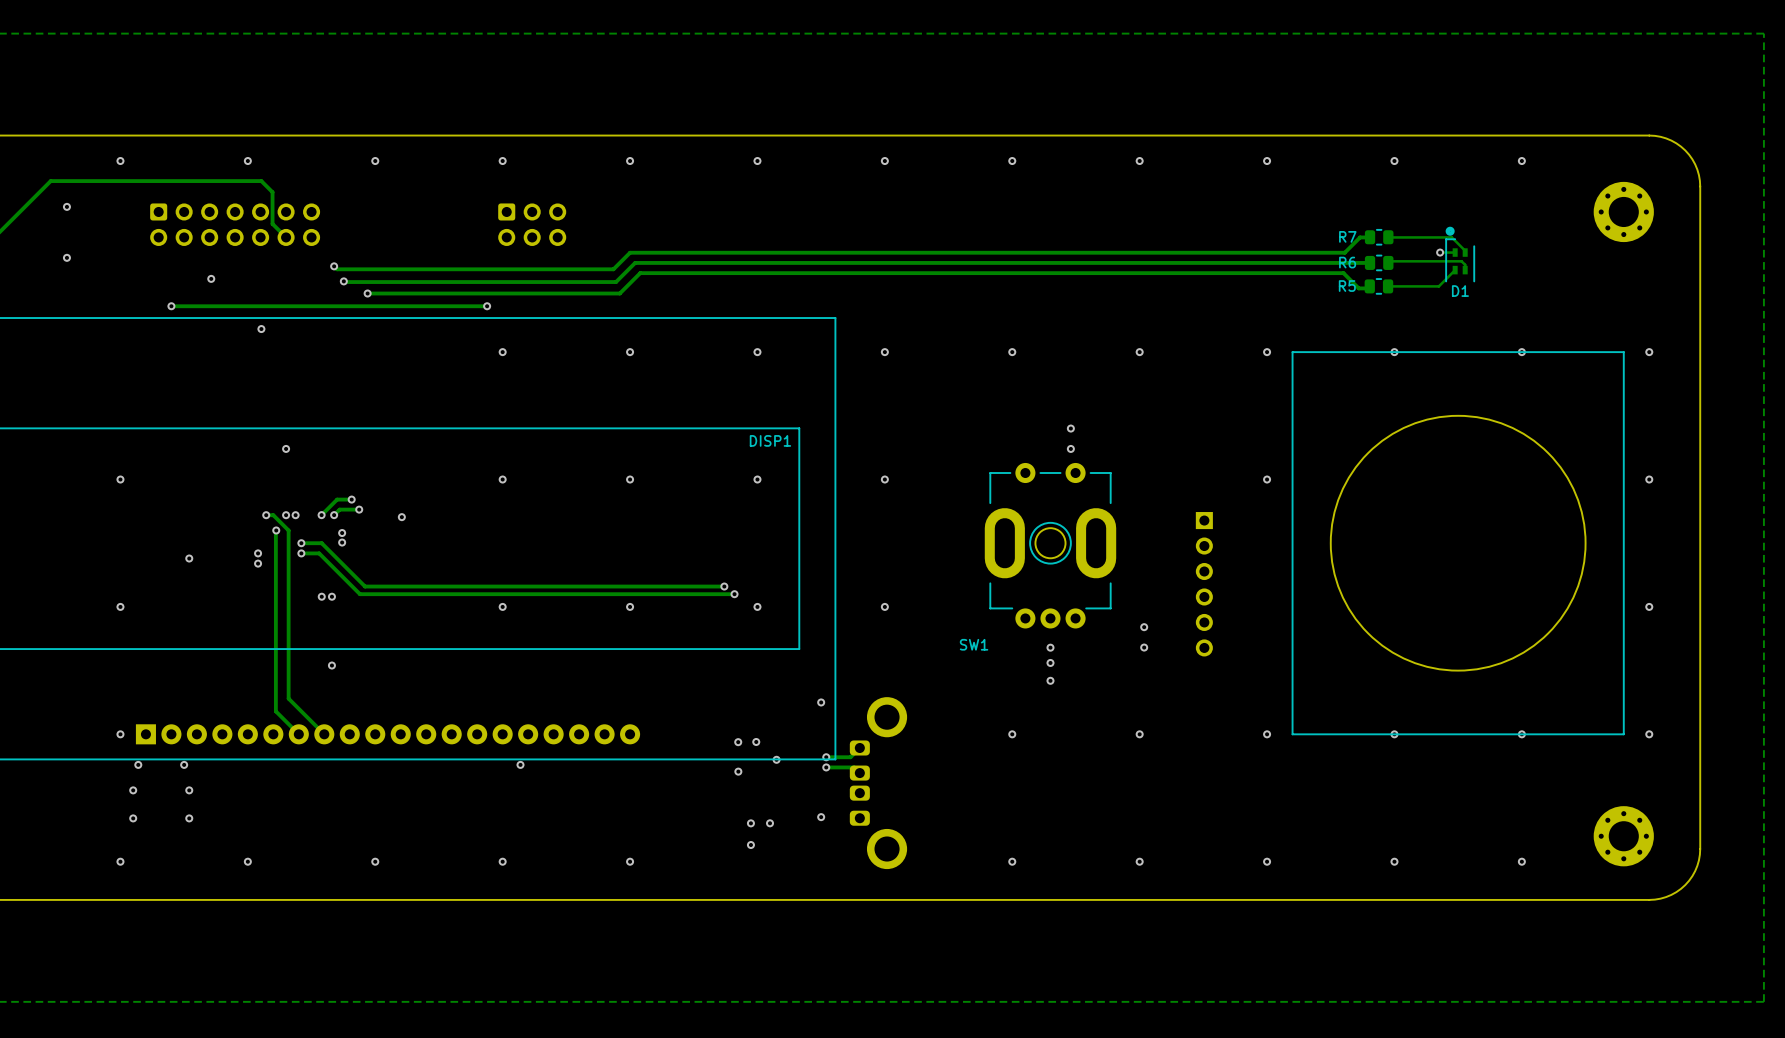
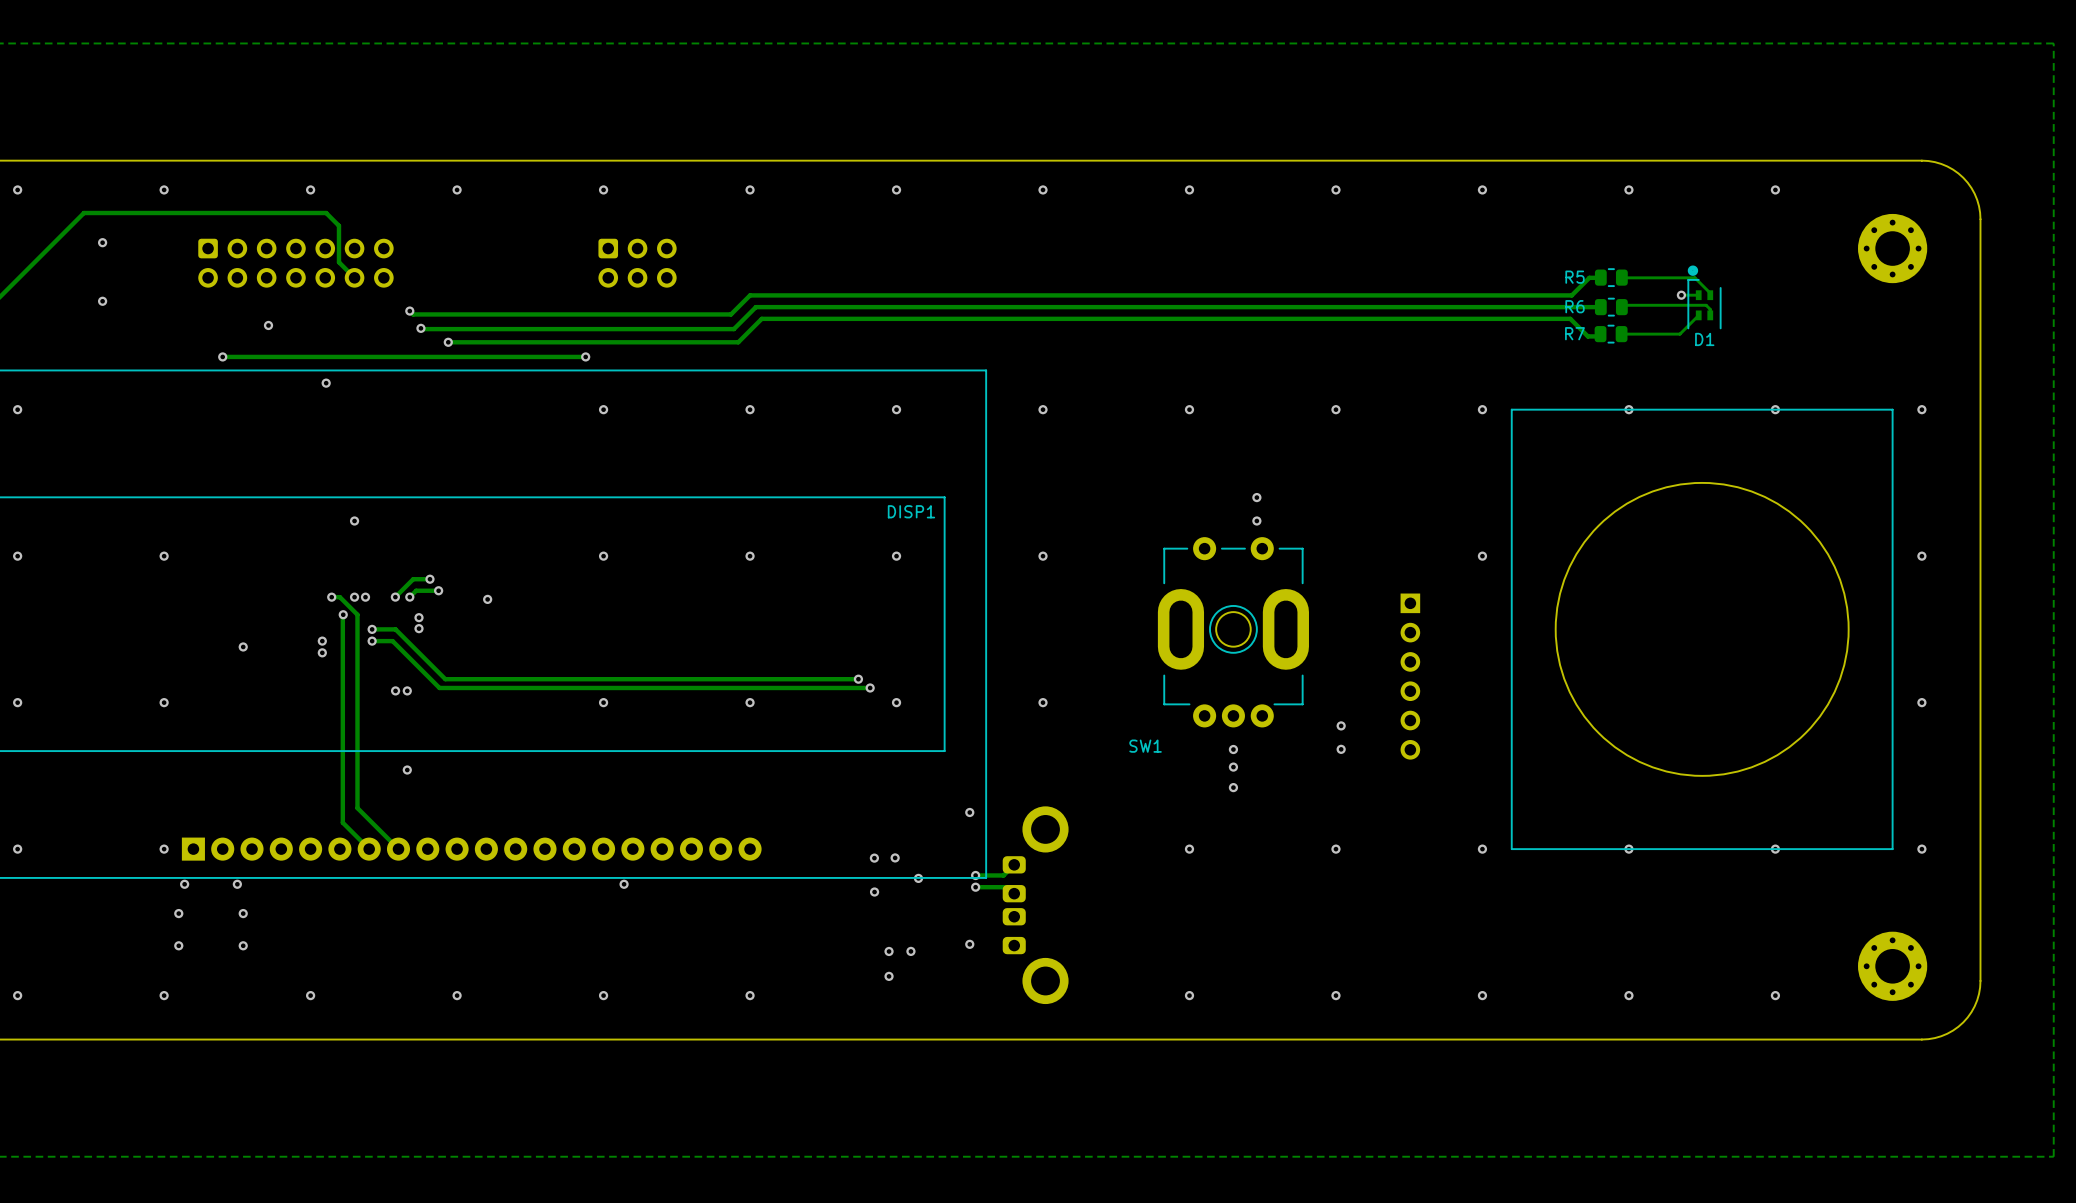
R7 name: R7 (1347, 236) -> R5 (1575, 277)
R5 name: R5 (1347, 286) -> R7 (1574, 333)

